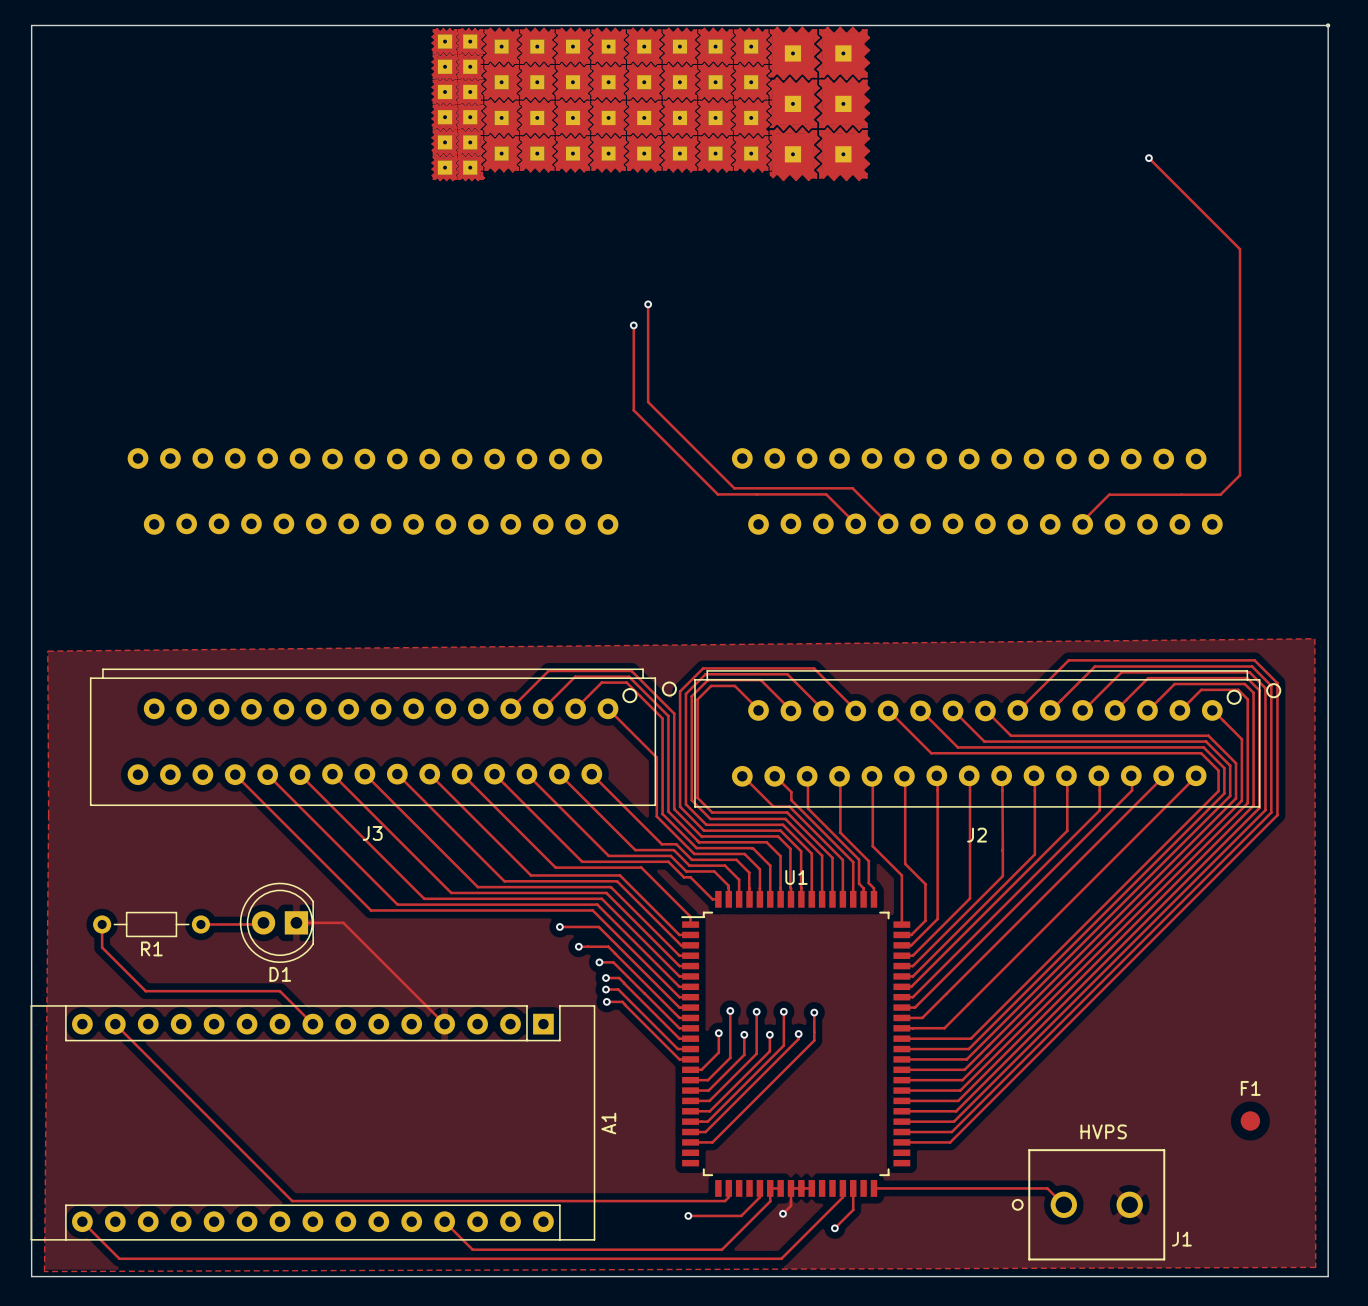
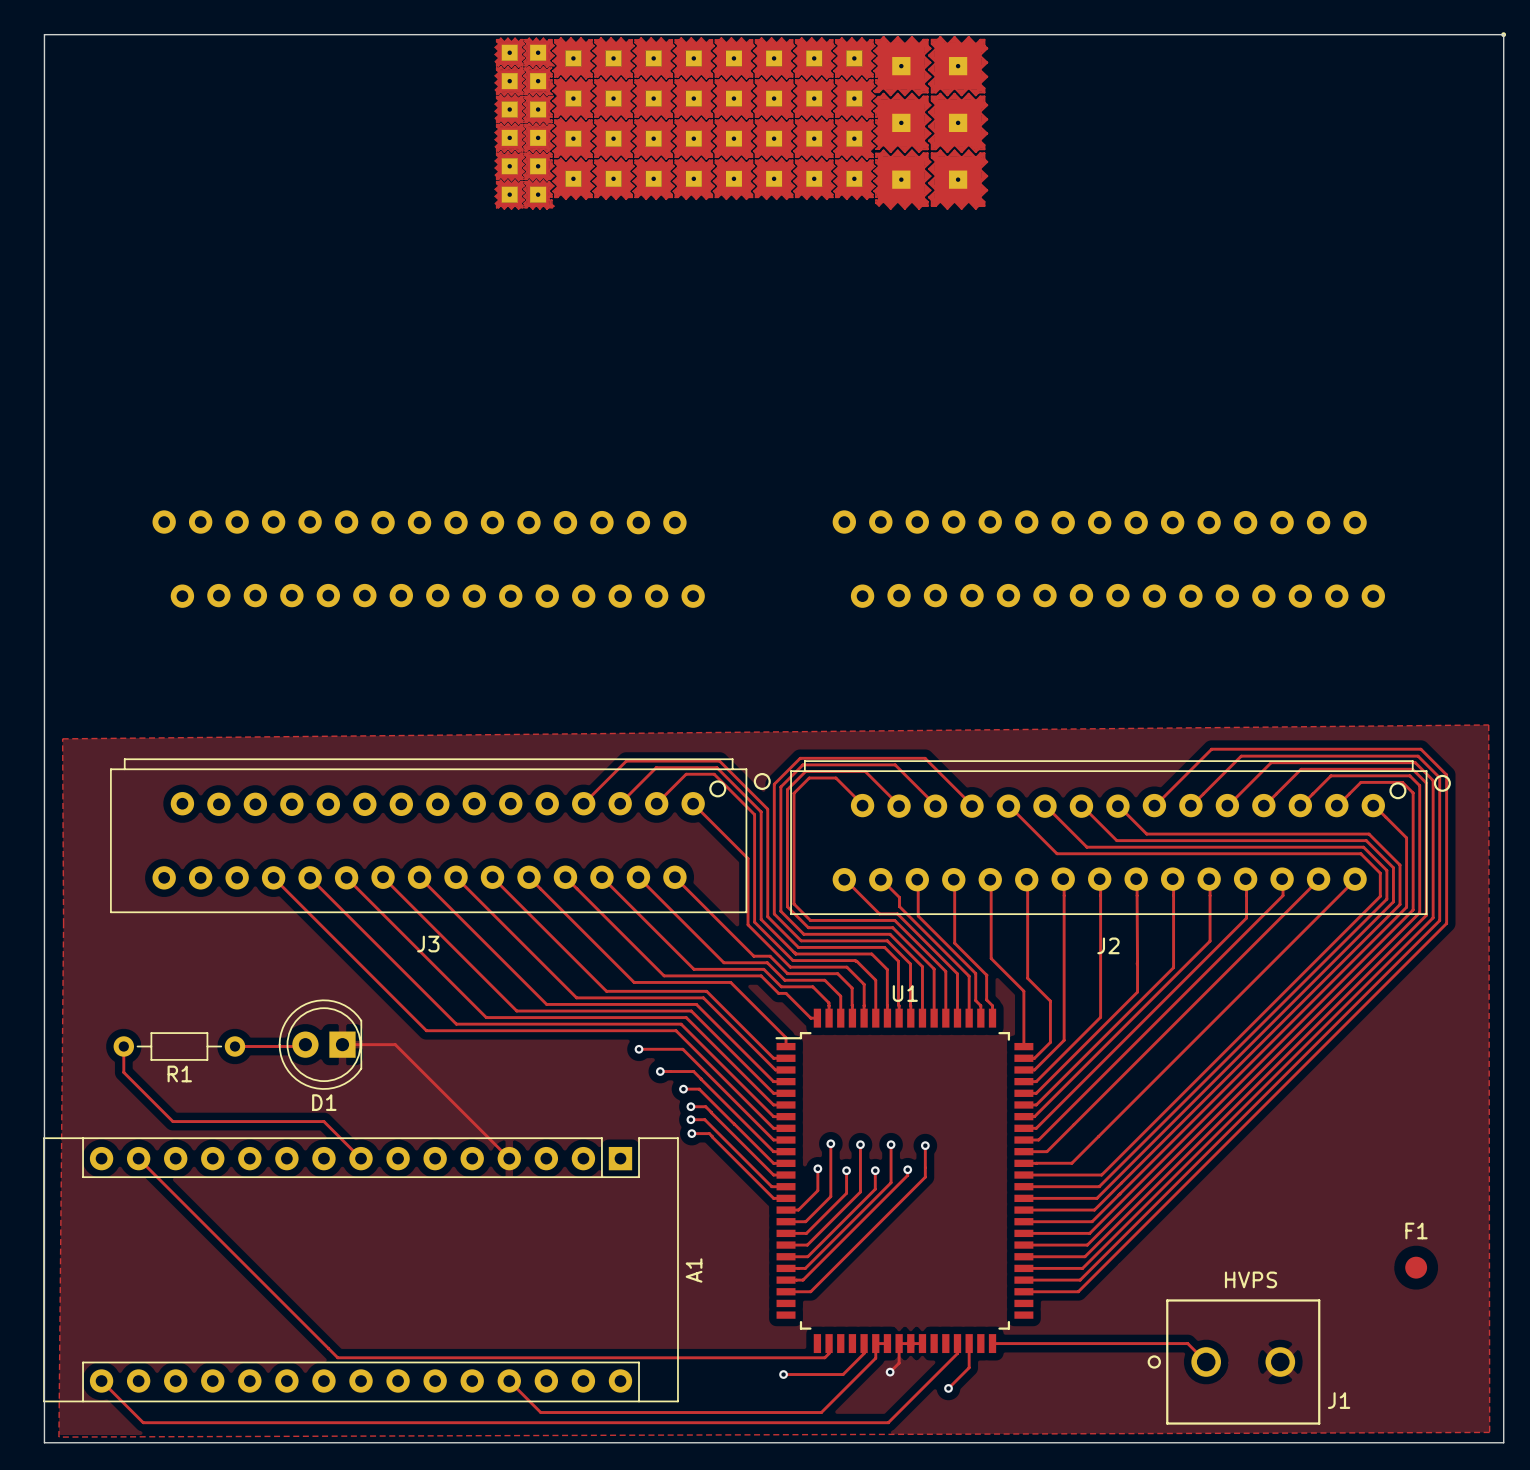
track: (1148, 158) (1240, 249) (1240, 475) (1220, 494) (1109, 494) (1082, 521) (1082, 524) -> none
via: (1148, 158) -> none
track: (648, 304) (648, 402) (734, 488) (852, 488) (888, 523) -> none
via: (648, 304) -> none
track: (633, 325) (633, 410) (717, 494) (826, 494) (855, 523) -> none
via: (633, 325) -> none

